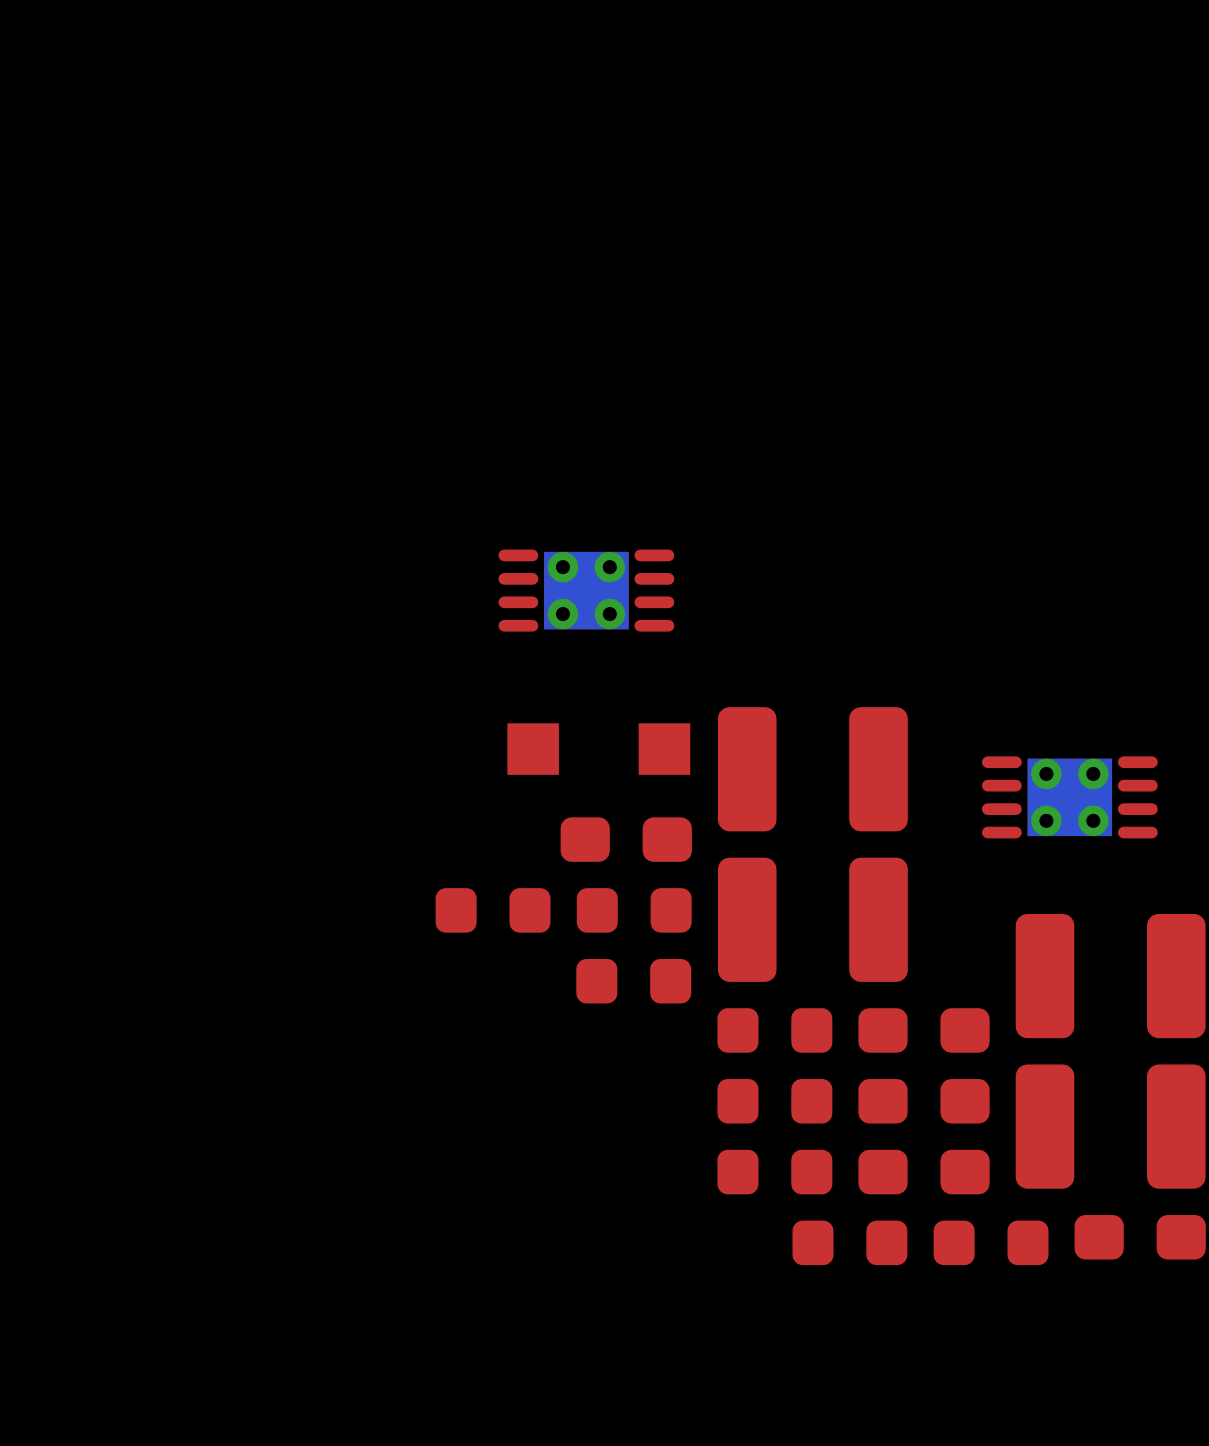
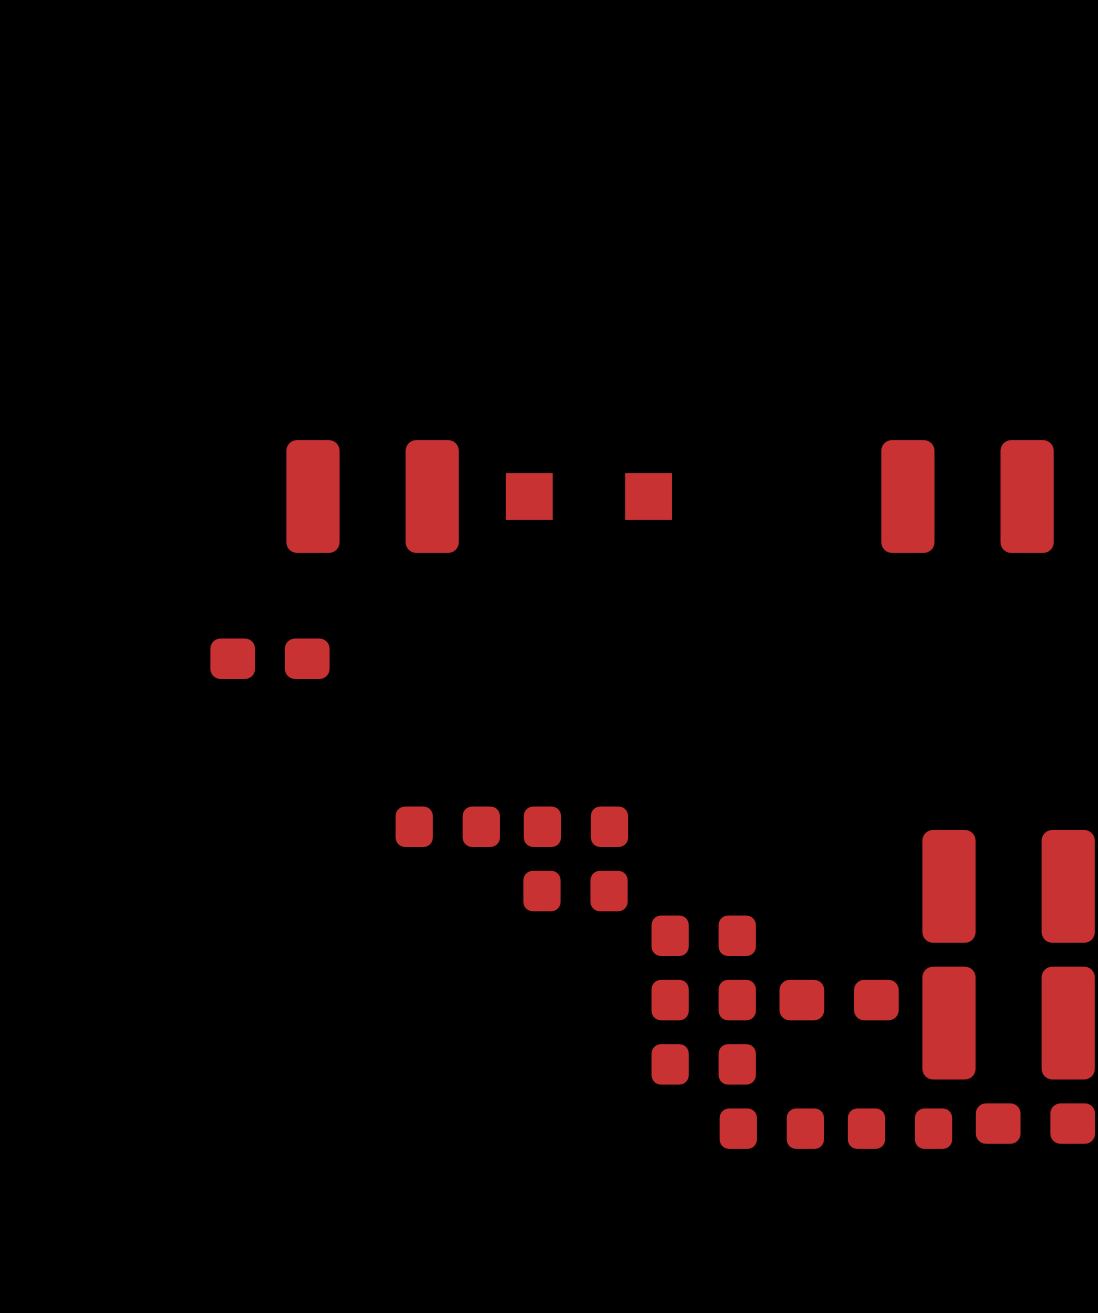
part: none -> (372, 496)
part: none -> (967, 496)
part: (586, 590) -> none
part: none -> (269, 658)
part position: (598, 749) -> (588, 496)
part: (812, 769) -> none
part: (1069, 797) -> none
part: (626, 839) -> none
part: (812, 919) -> none
part: (924, 1030) -> none
part: (924, 1172) -> none

